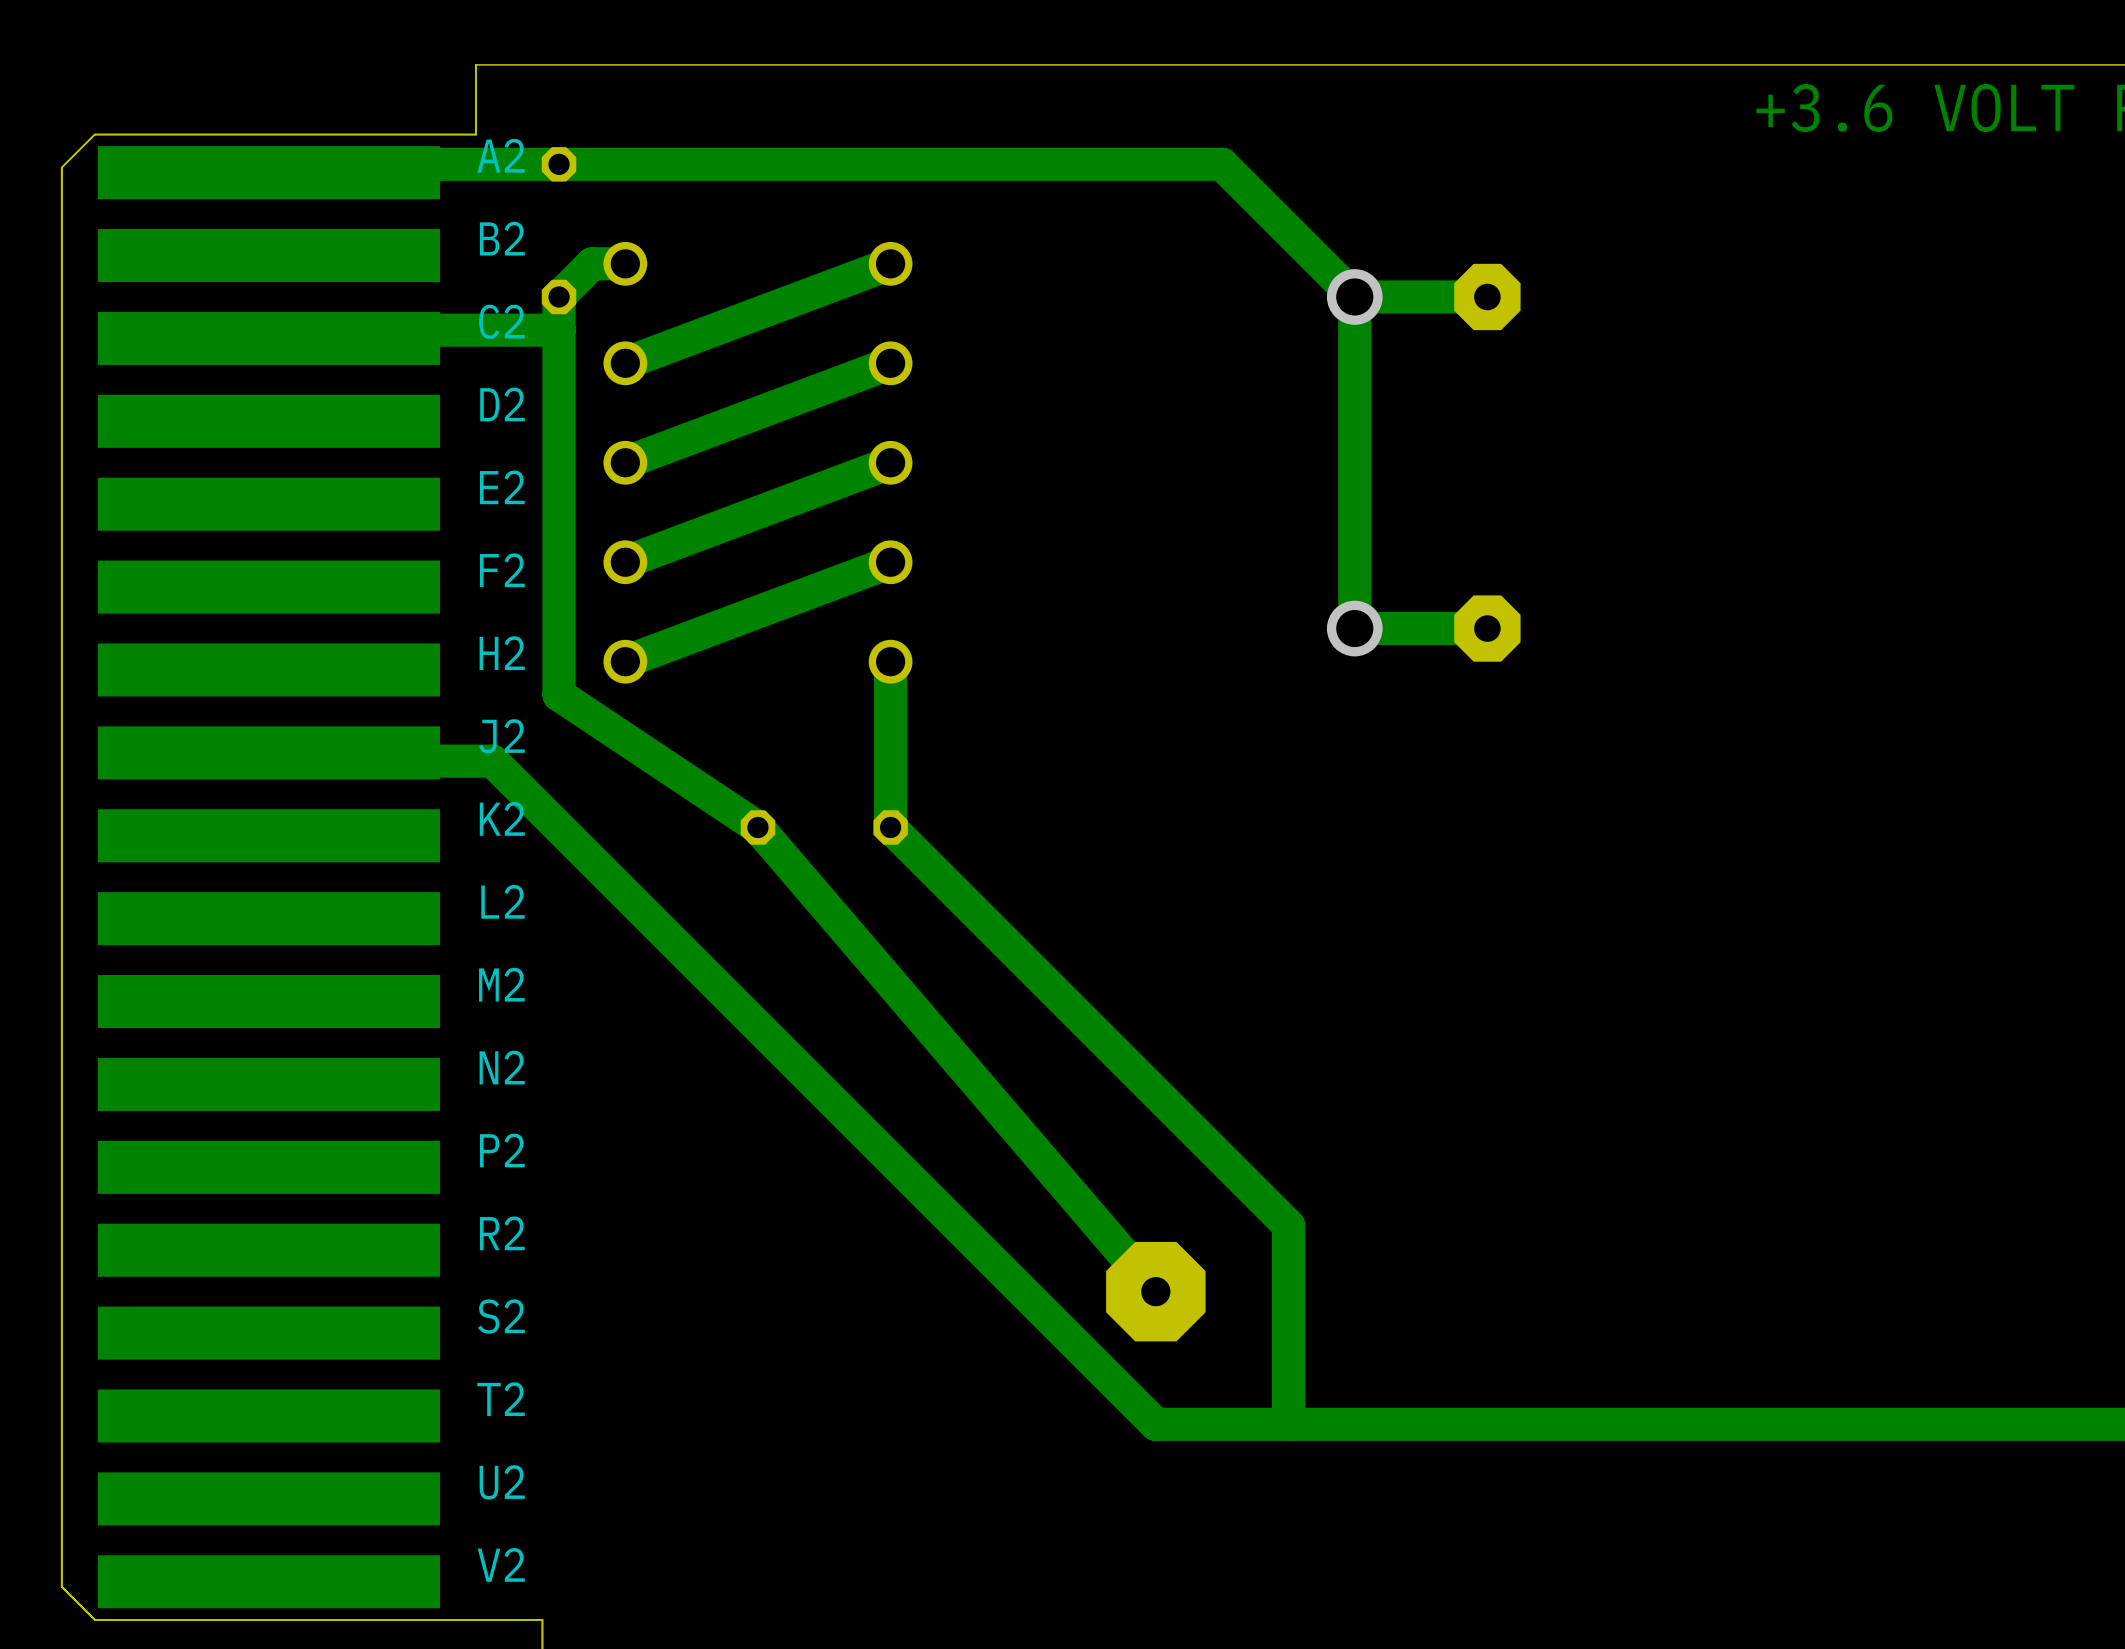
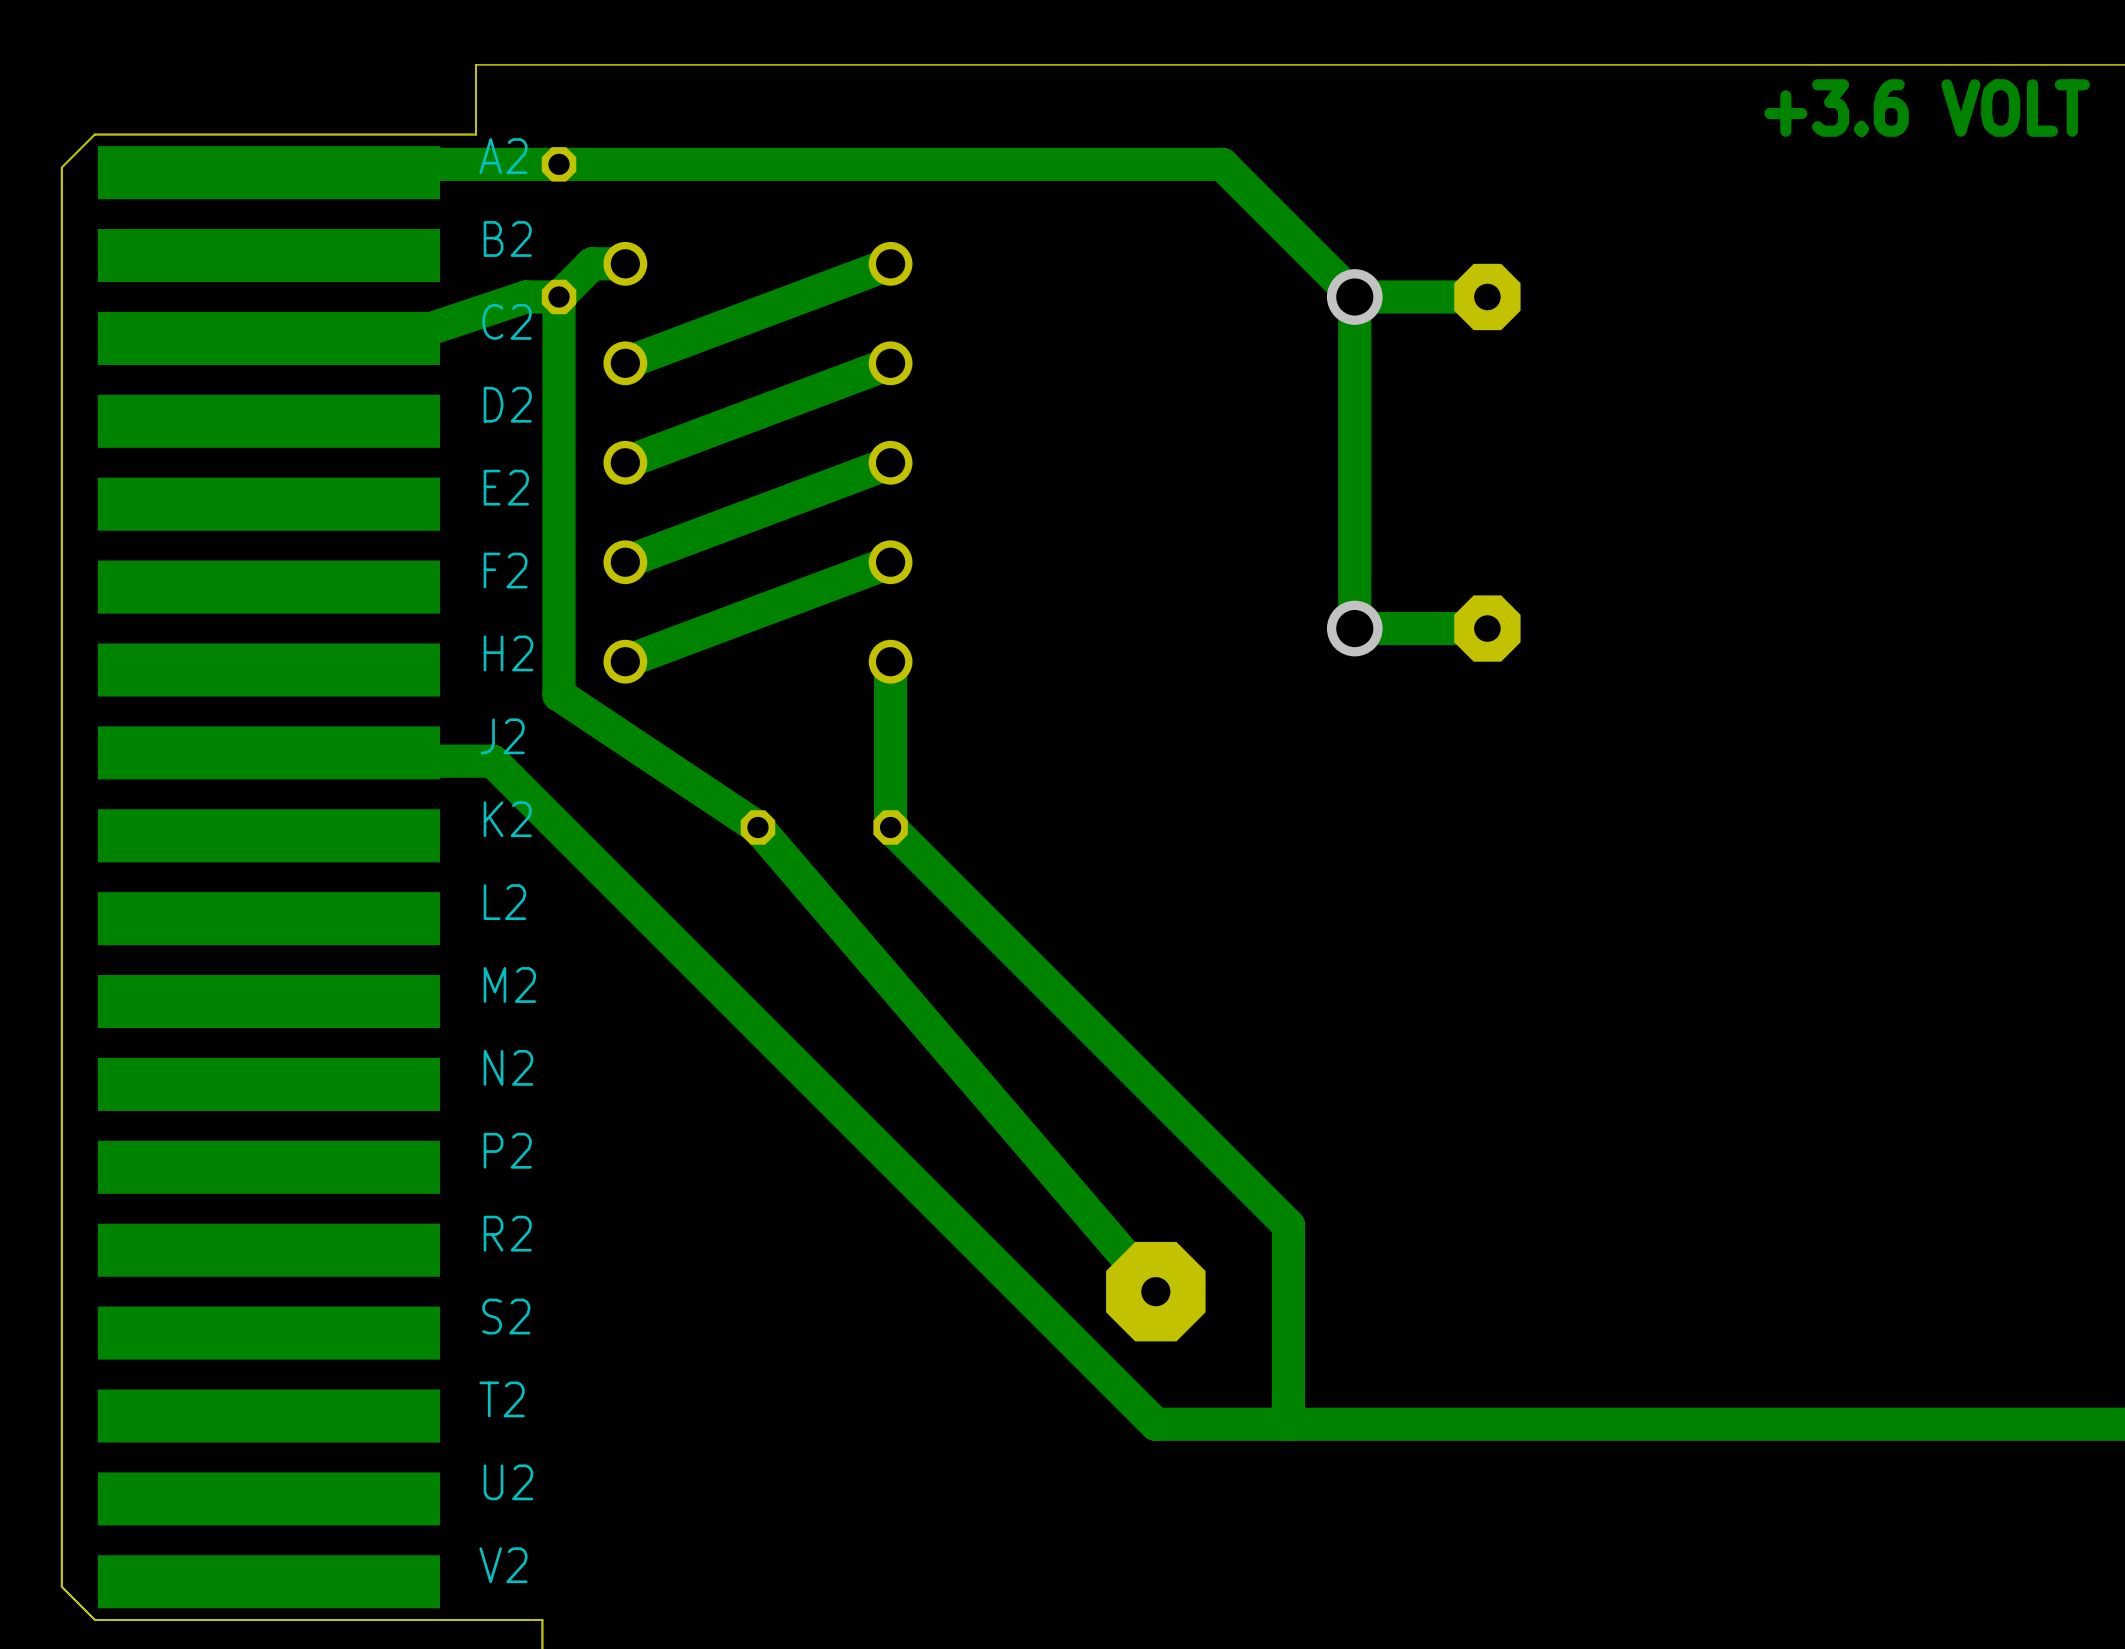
bottom track: (559, 330) (426, 330) -> (559, 296) (525, 296) (426, 330)

